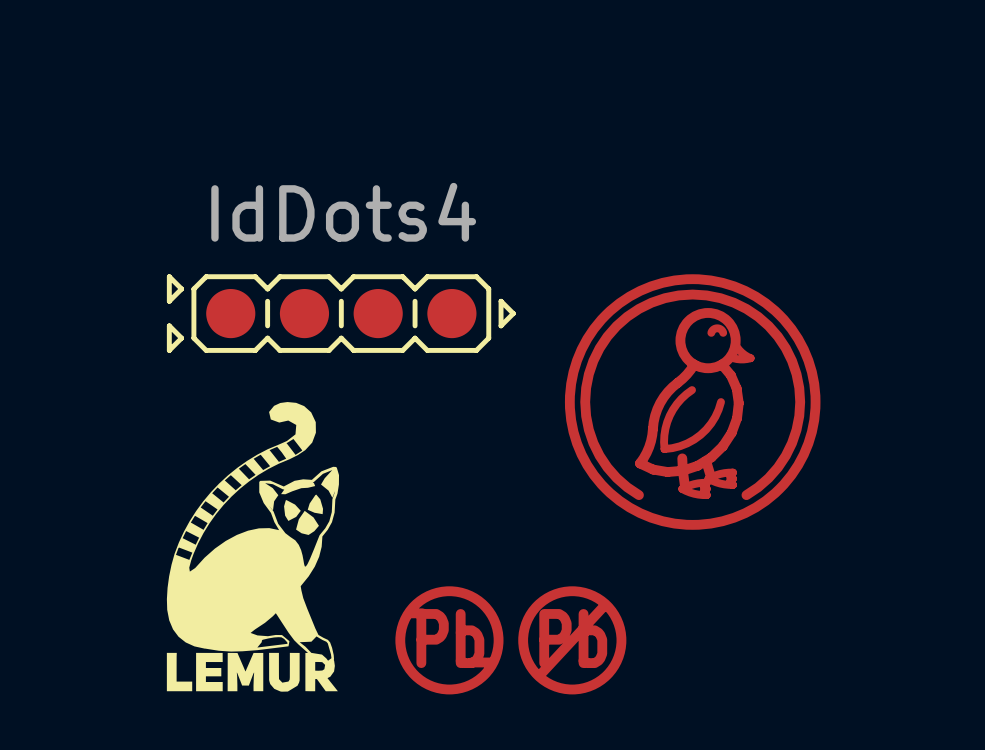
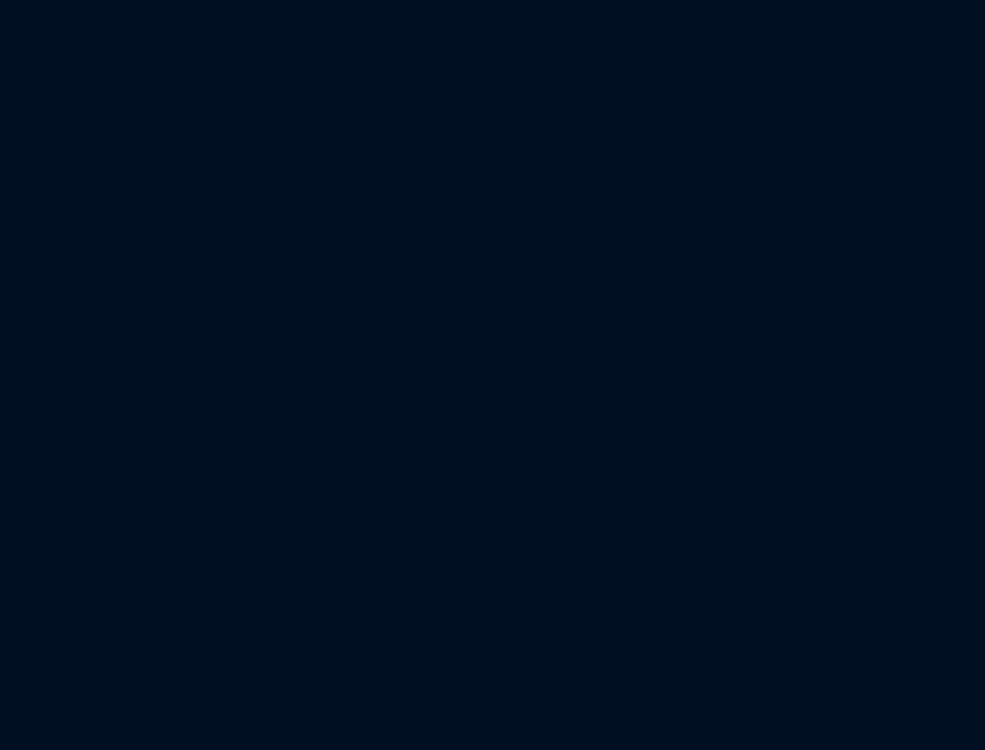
drawing: [166, 274, 821, 695] -> none

